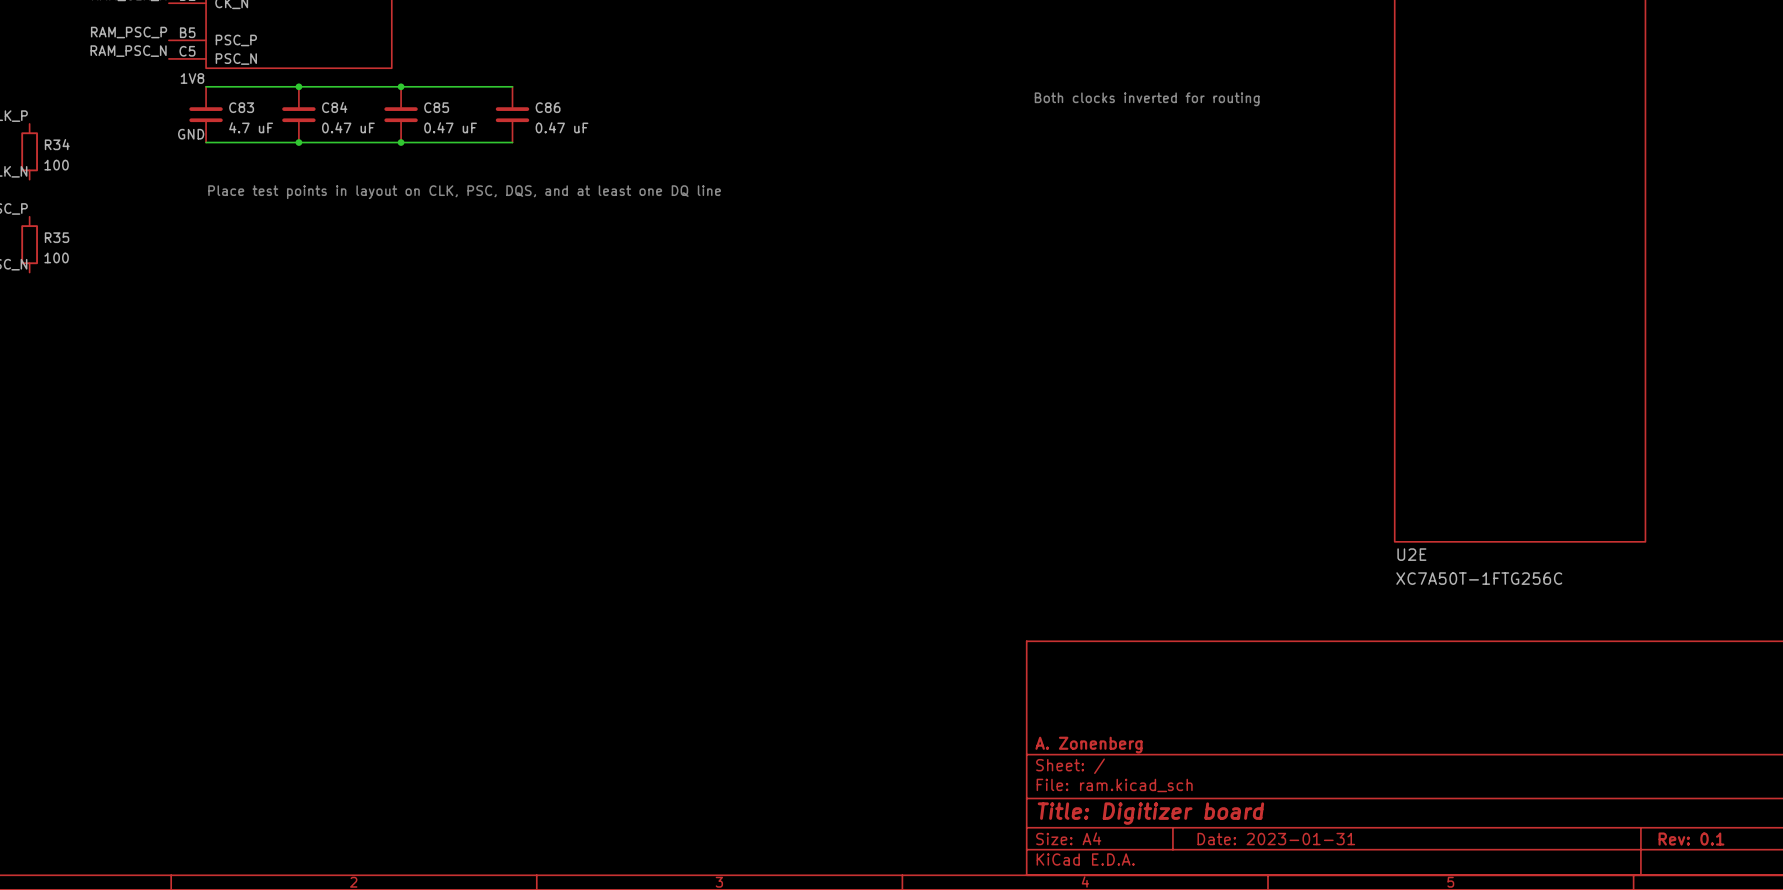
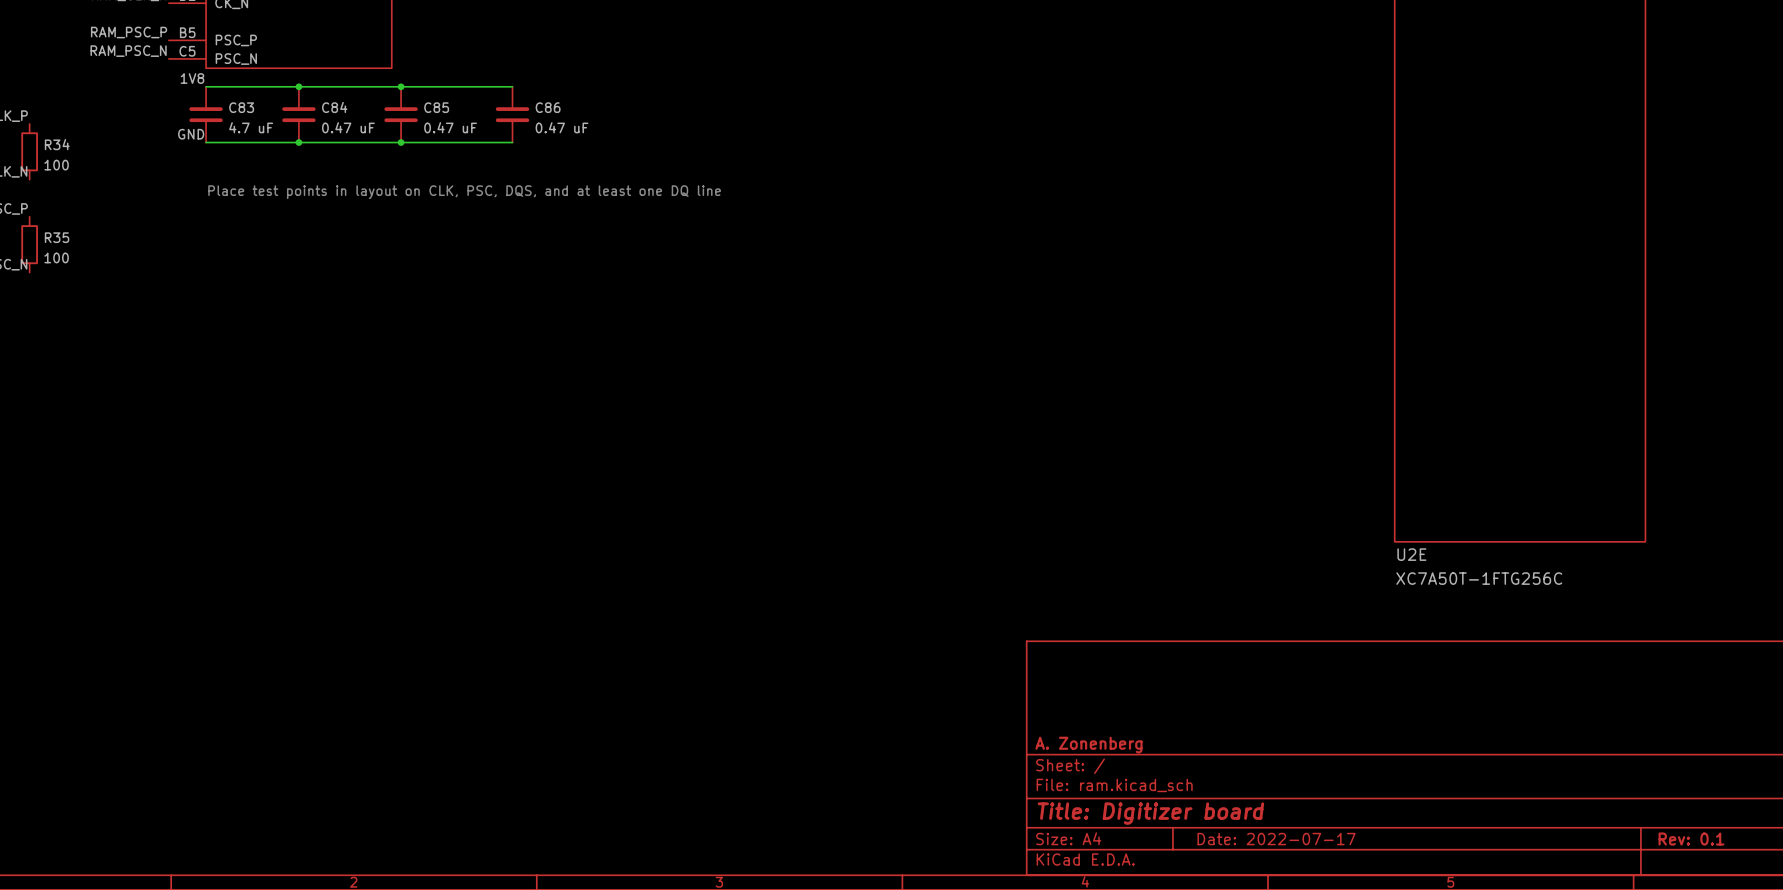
text: Both clocks inverted for routing (1147, 99) -> none
title block: Date: 2023-01-31 (1276, 839) -> Date: 2022-07-17 (1276, 839)

